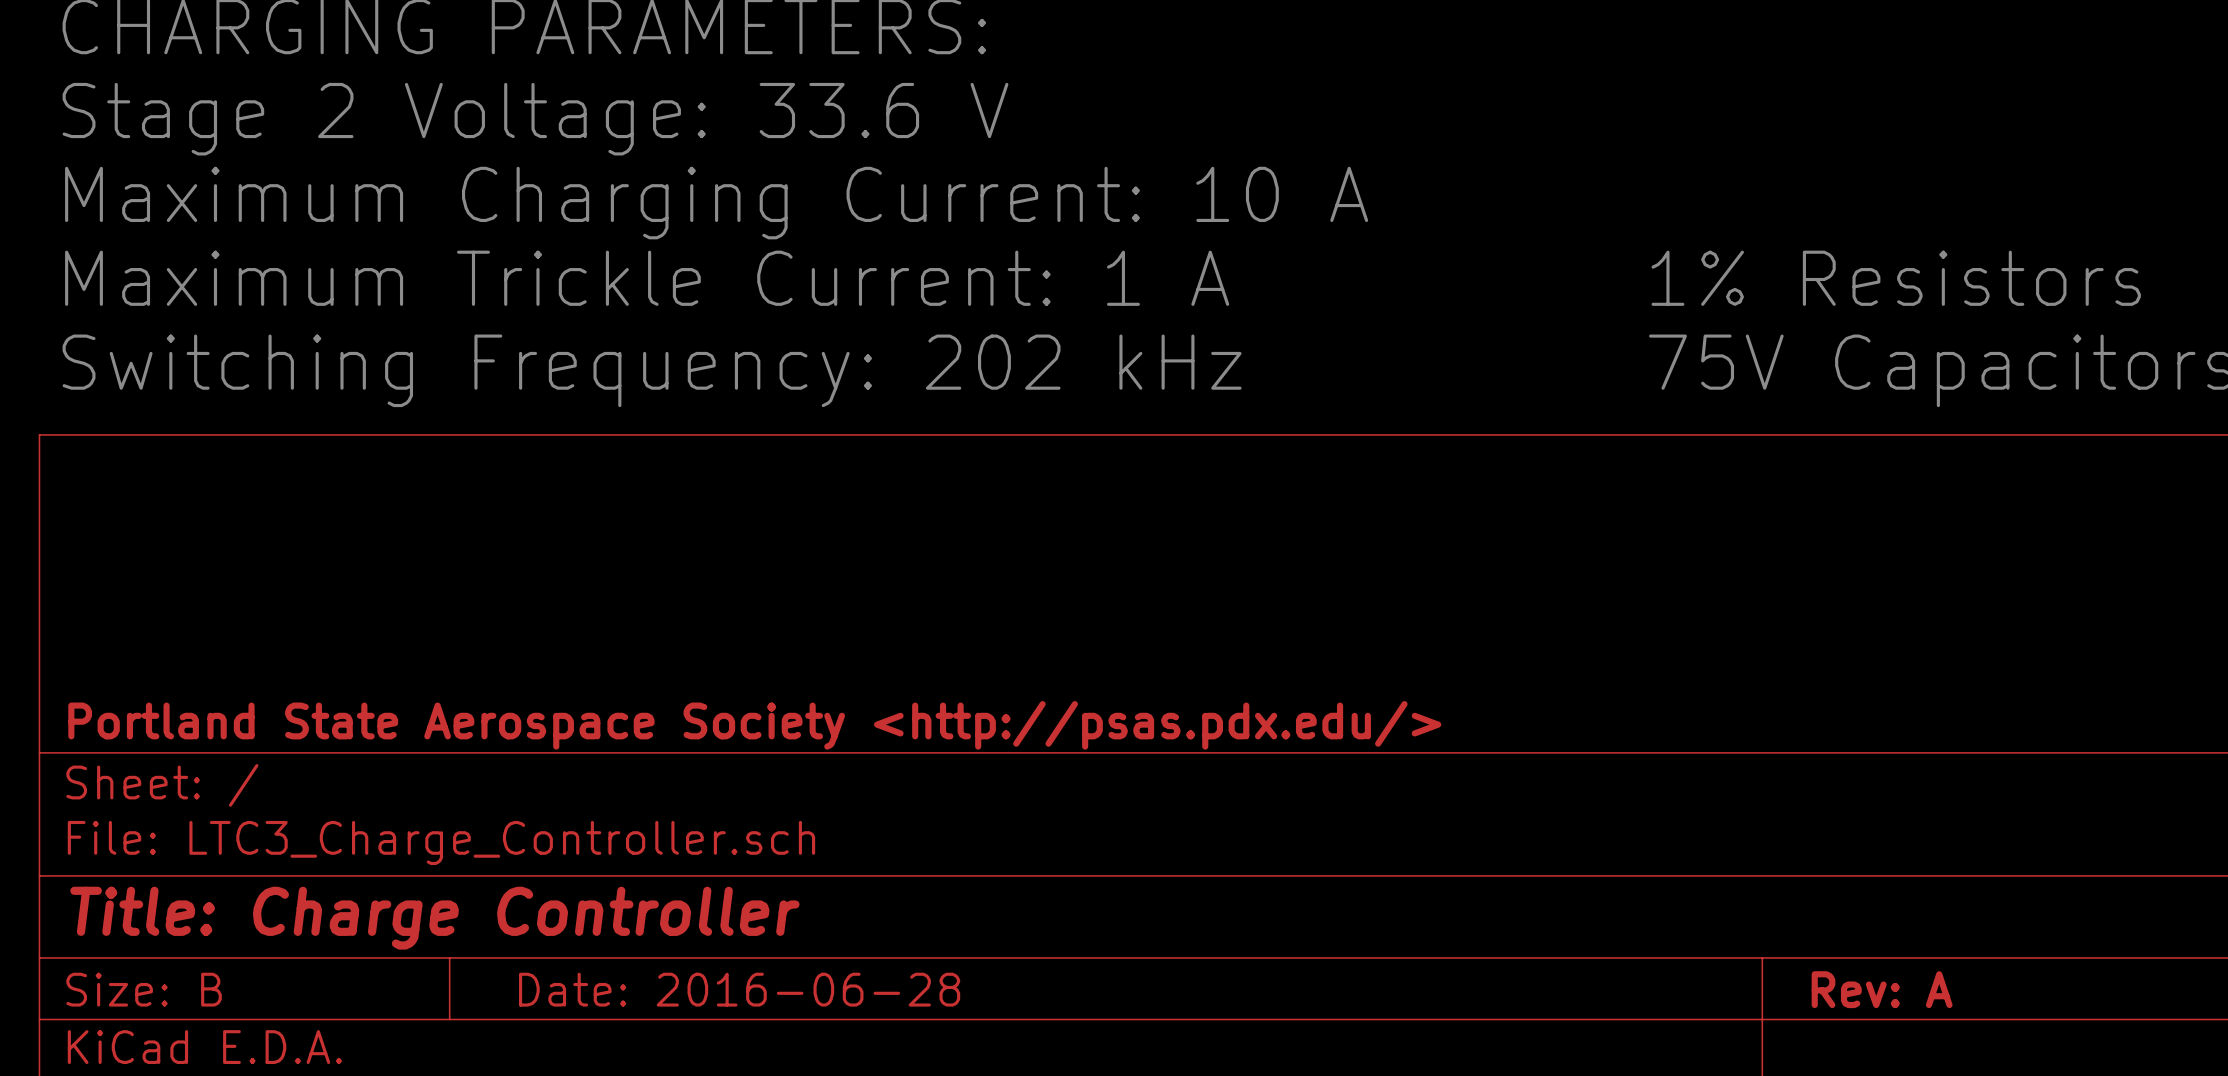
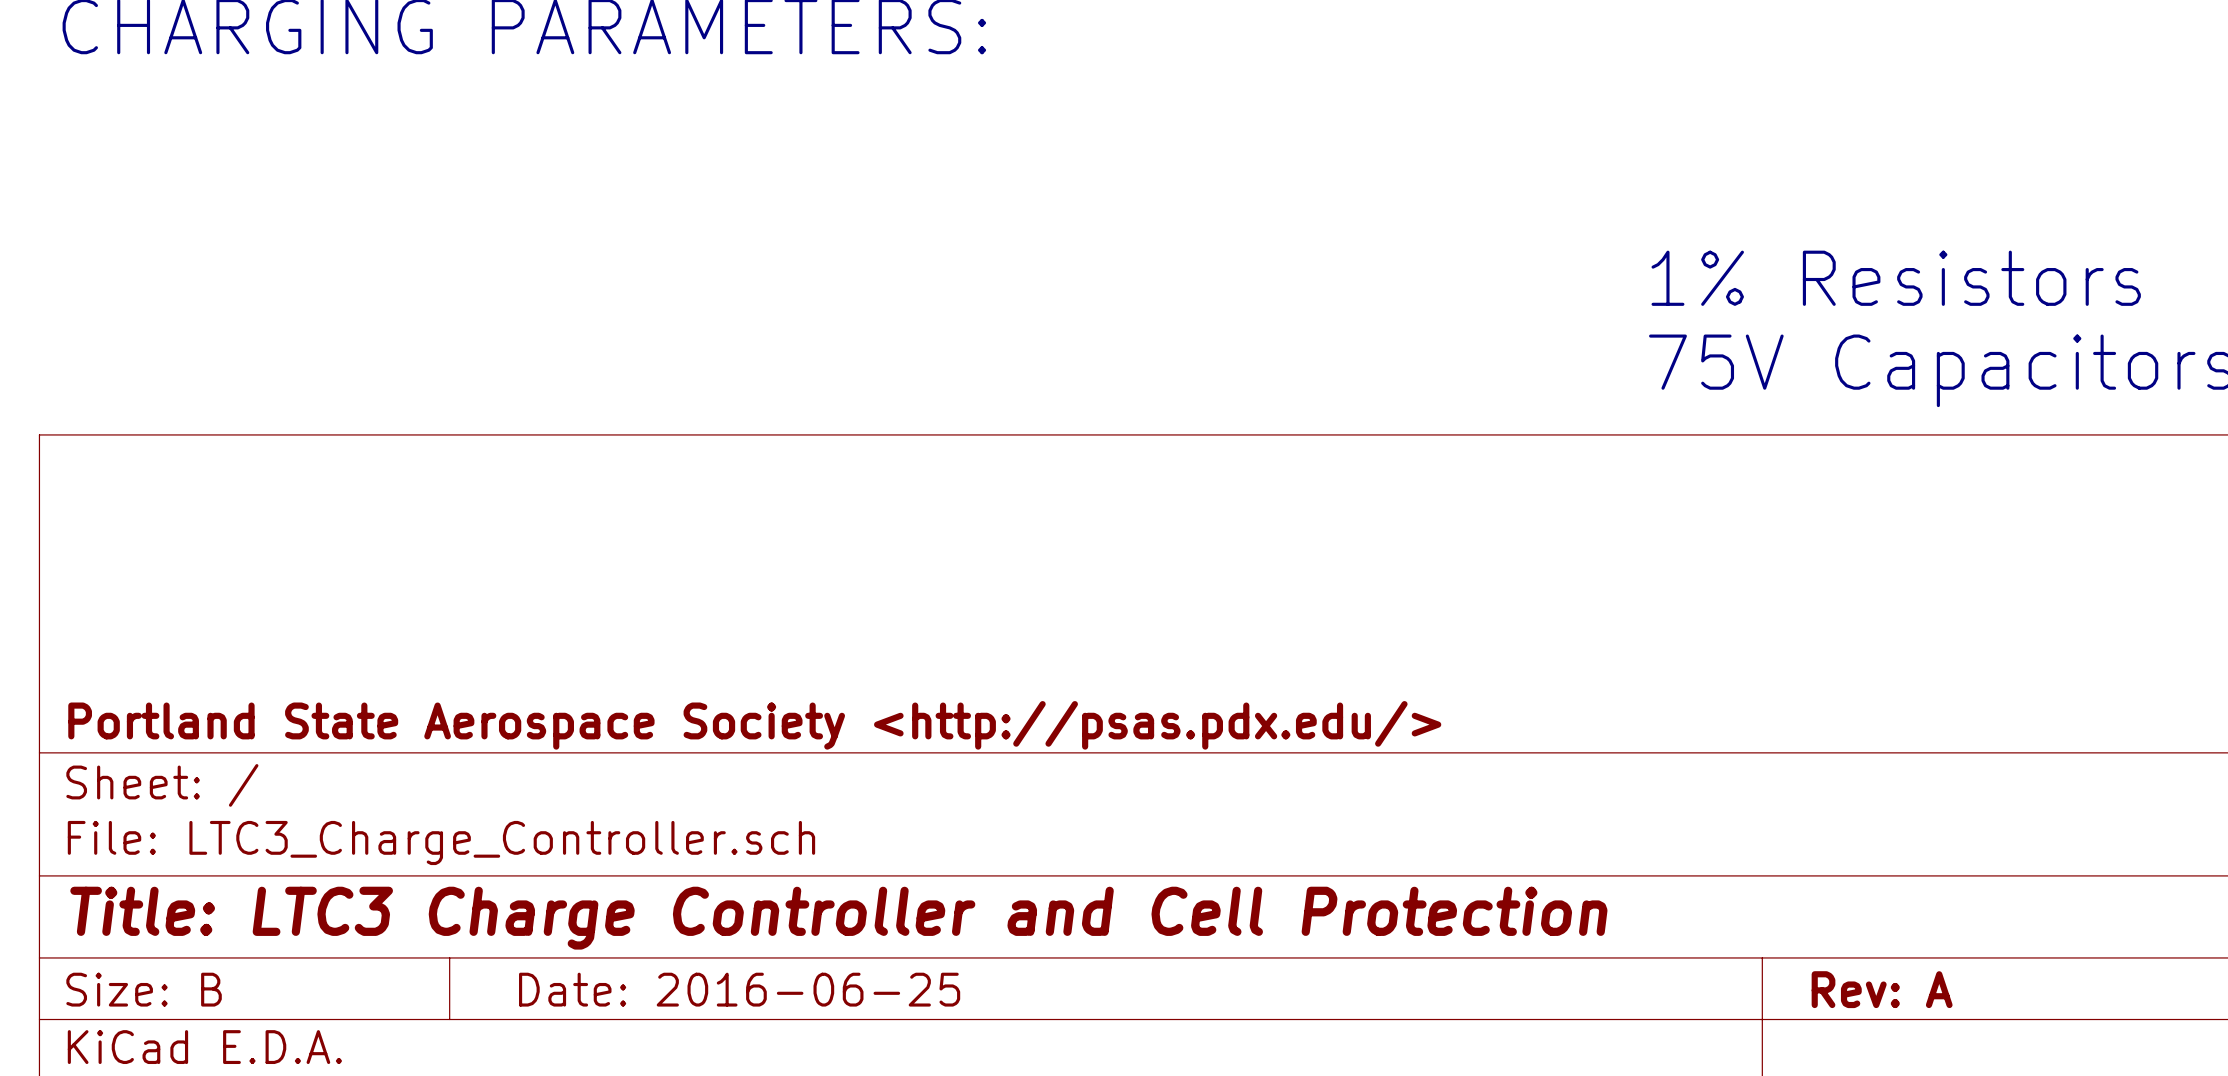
text: Stage 2 Voltage: 33.6 V (535, 119) -> none
text: Maximum Charging Current: 10 A (716, 203) -> none
text: Maximum Trickle Current: 1 A (647, 278) -> none
text: Switching Frequency: 202 kHz (652, 370) -> none
title block: Title: Charge Controller (434, 918) -> Title: LTC3 Charge Controller and Cell Protection (838, 918)
title block: Date: 2016-06-28 (739, 989) -> Date: 2016-06-25 (739, 989)

